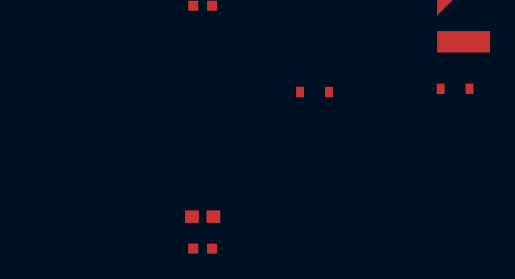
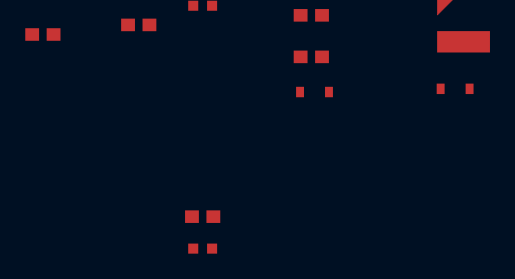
part: none -> (311, 15)
part: none -> (138, 24)
part: none -> (42, 34)
part: none -> (311, 56)

